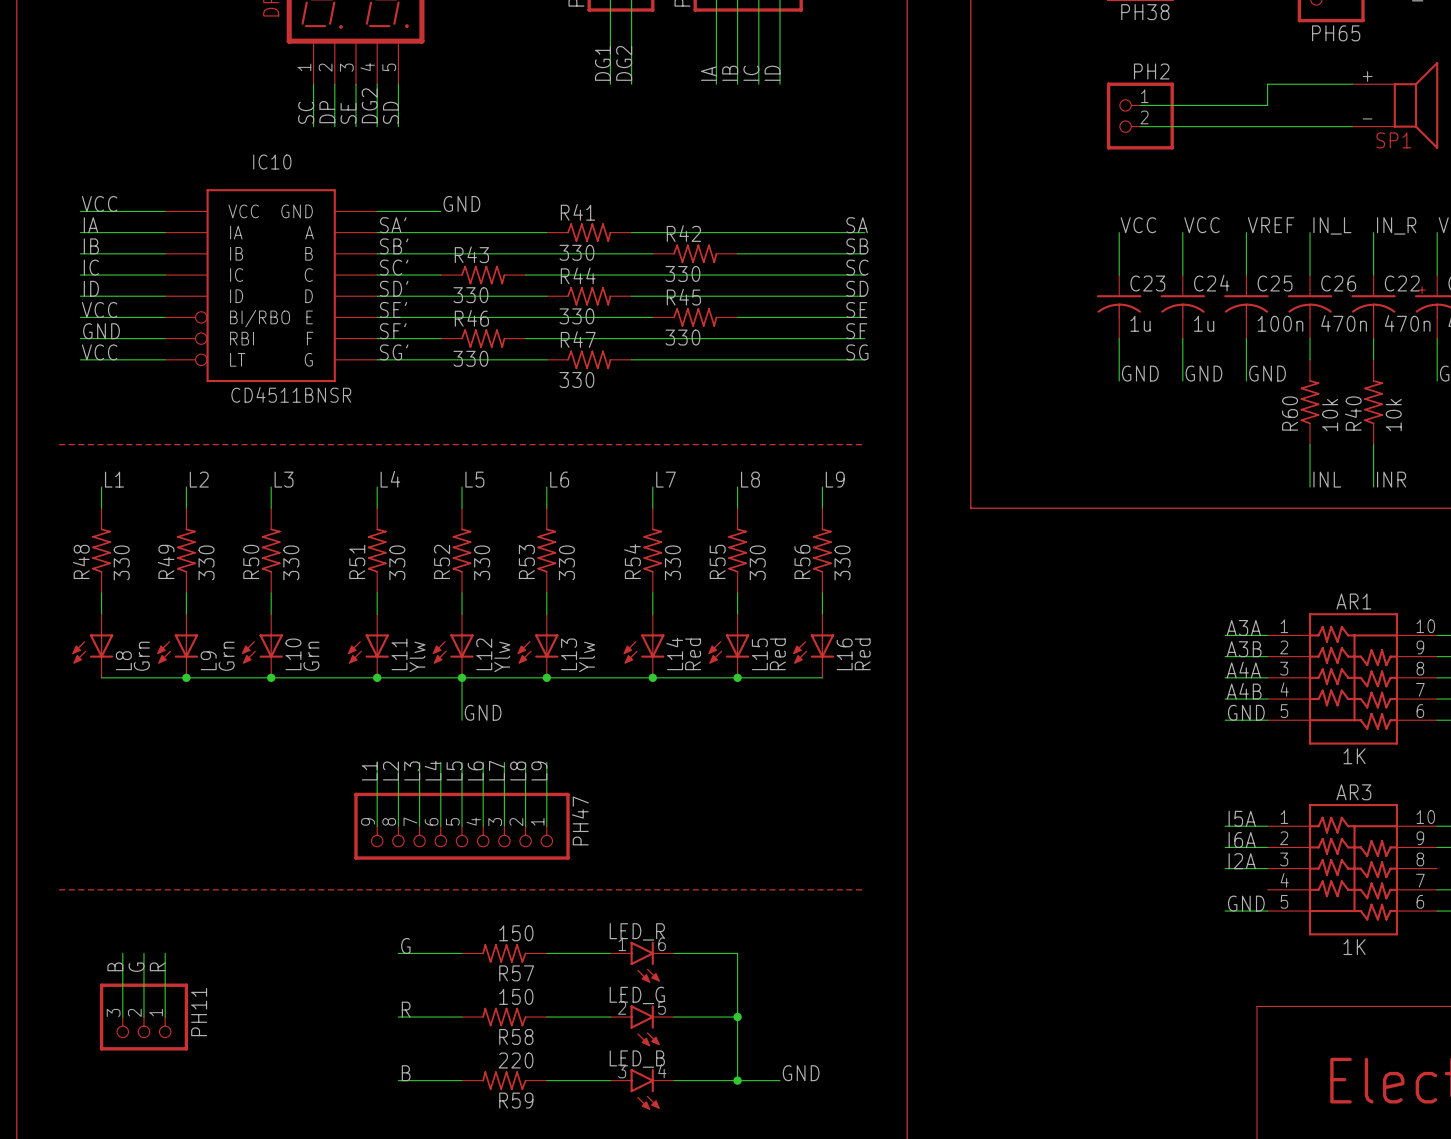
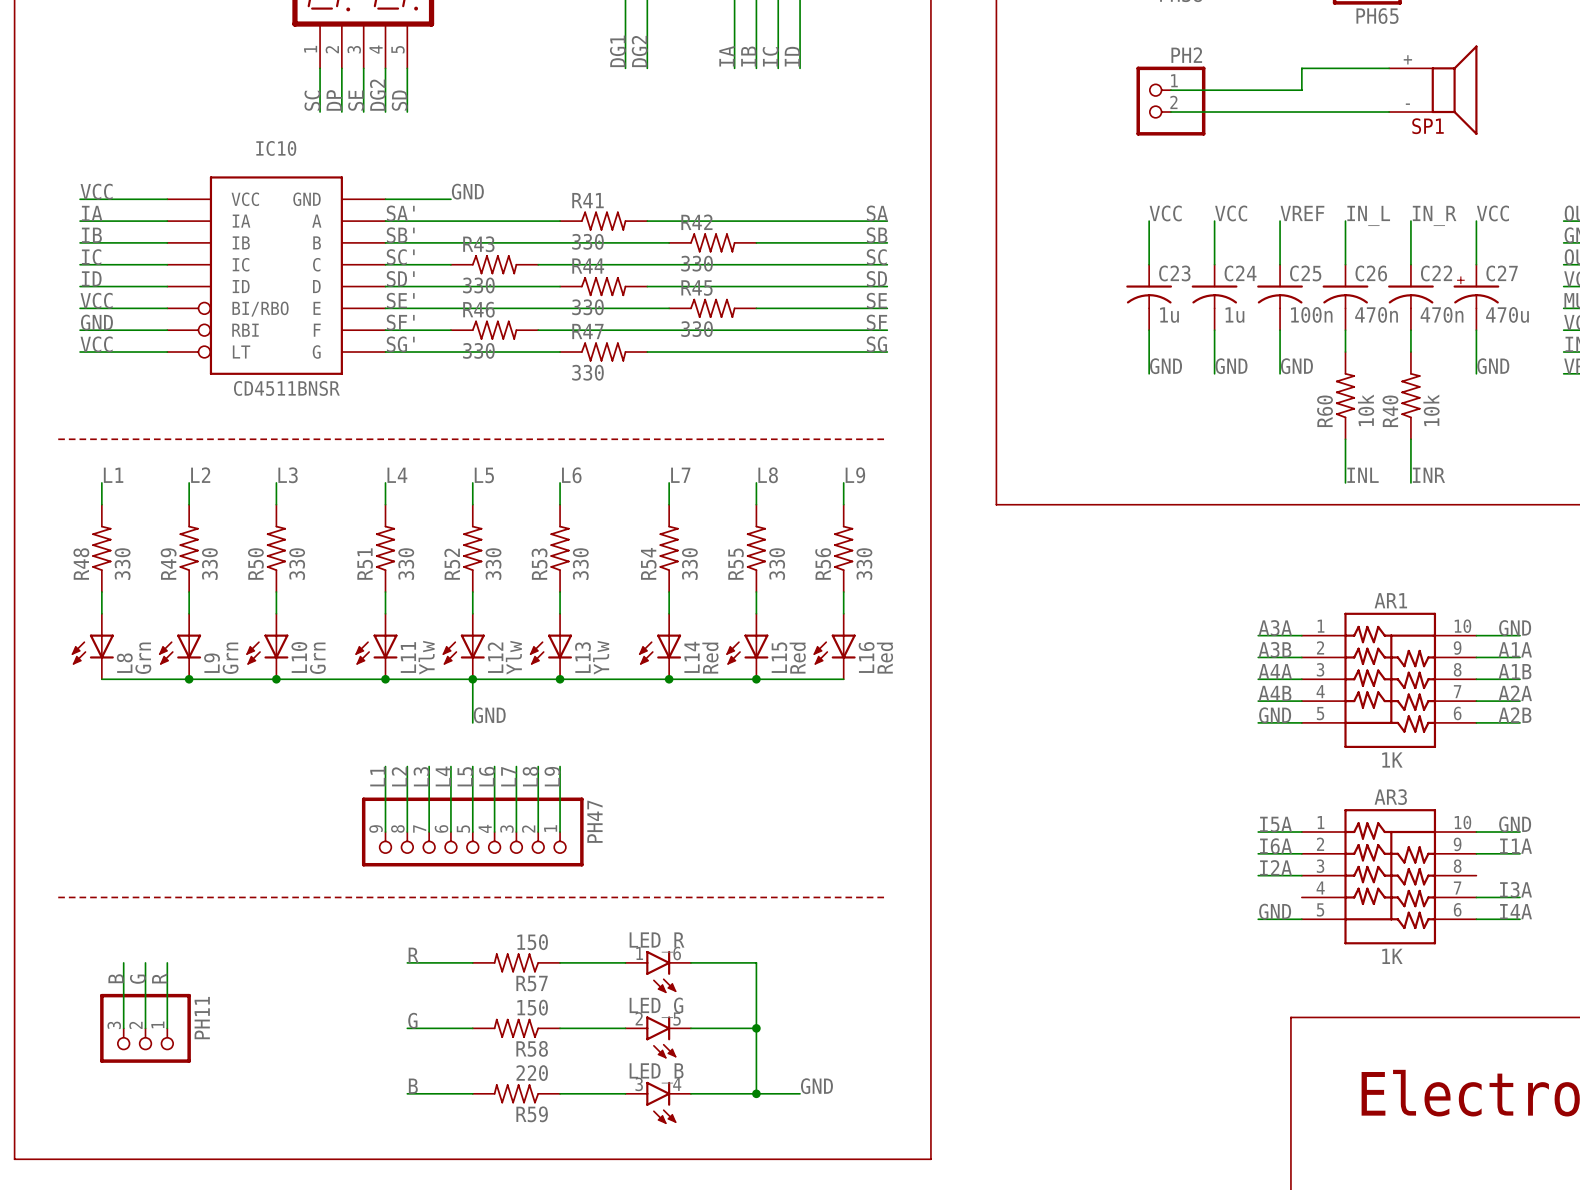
label: G (405, 946) -> R (413, 955)
label: R (406, 1009) -> G (412, 1020)

